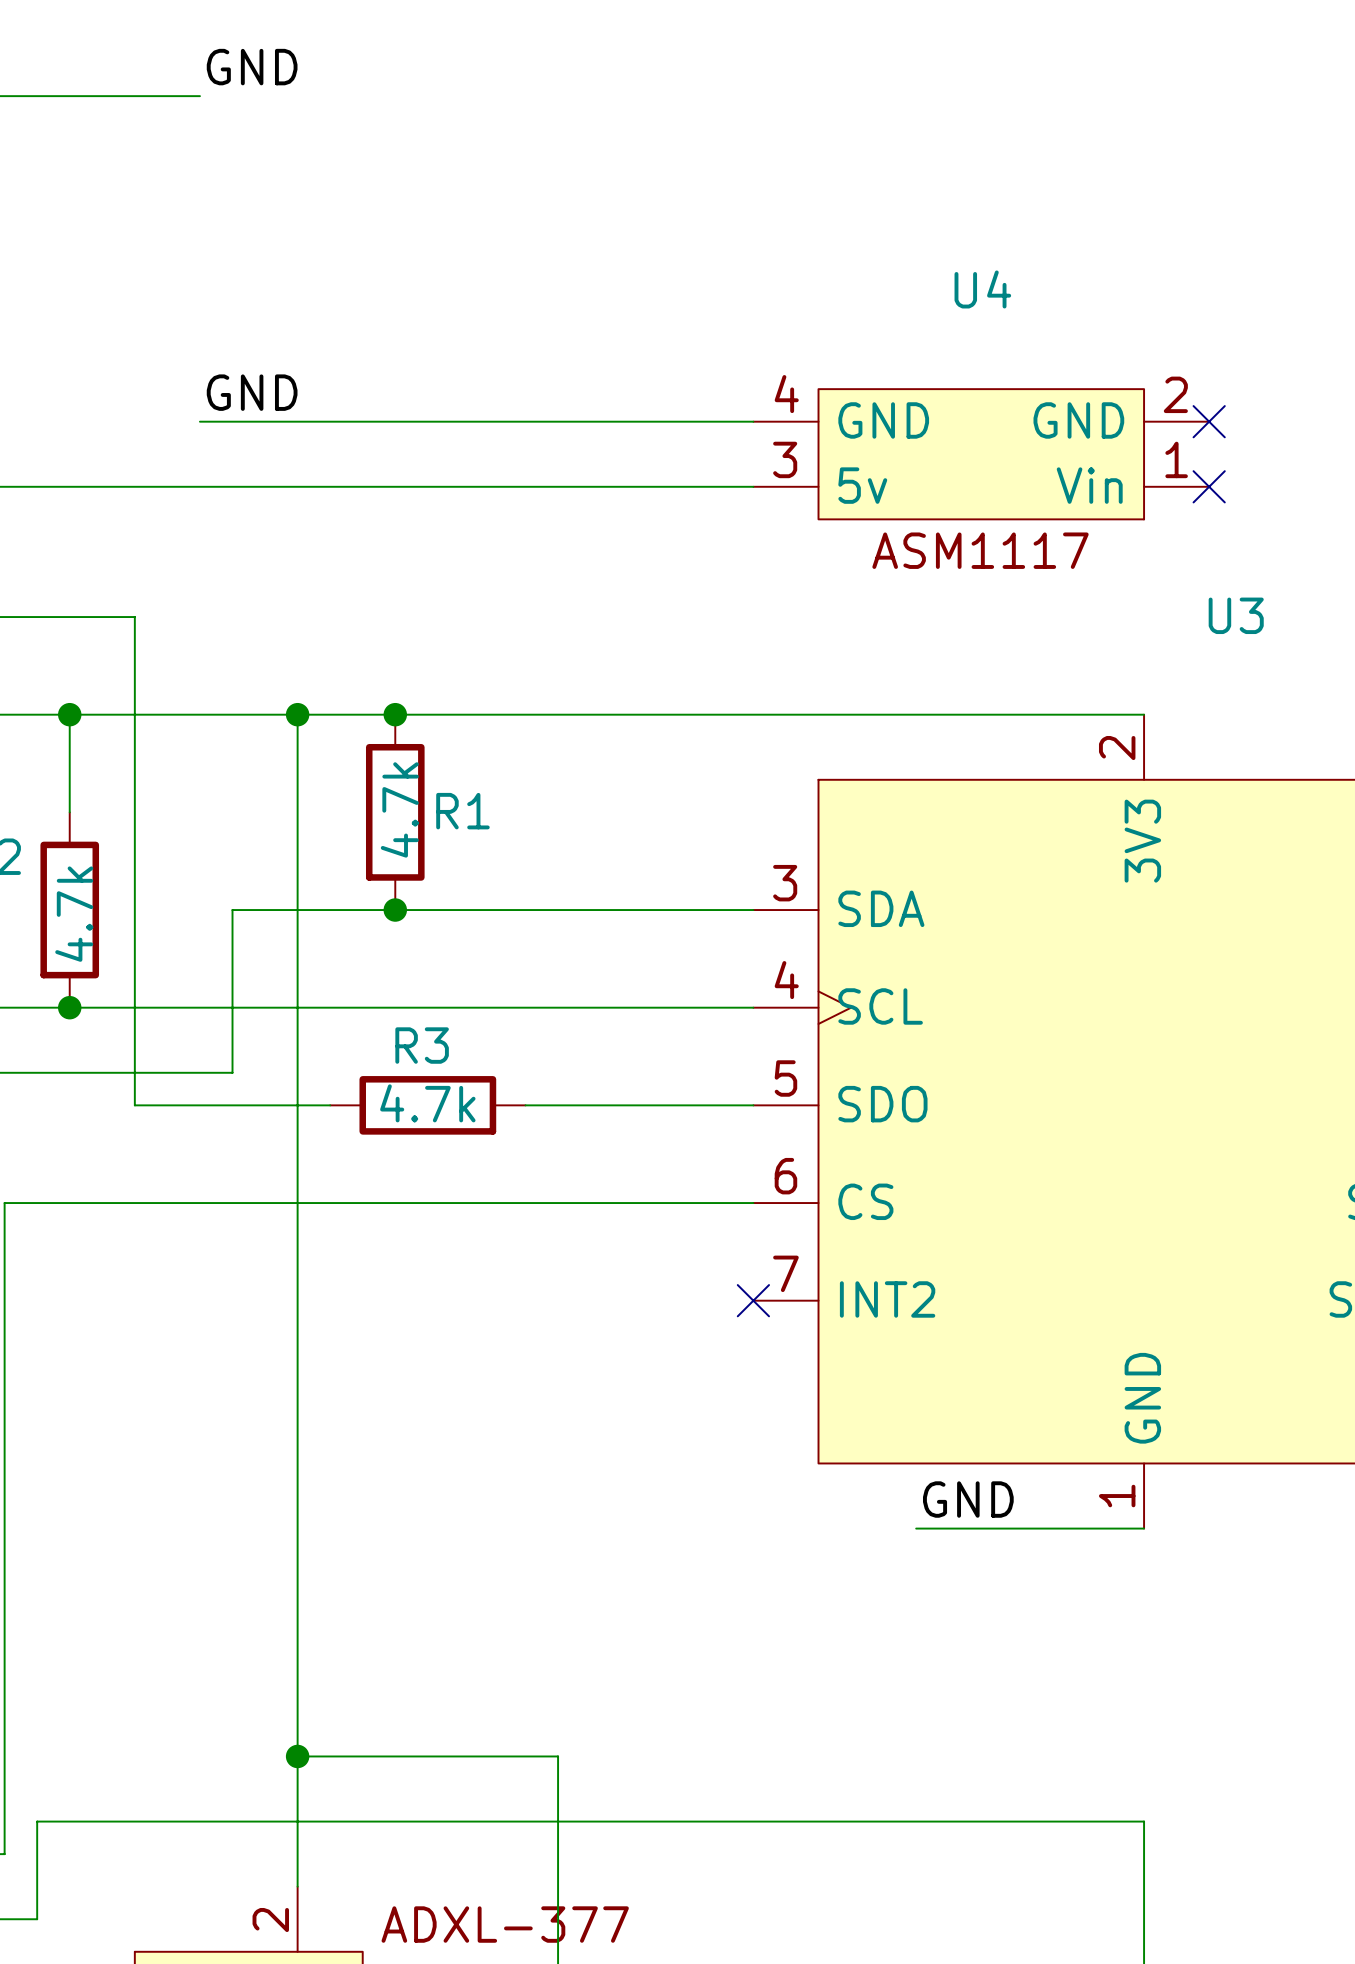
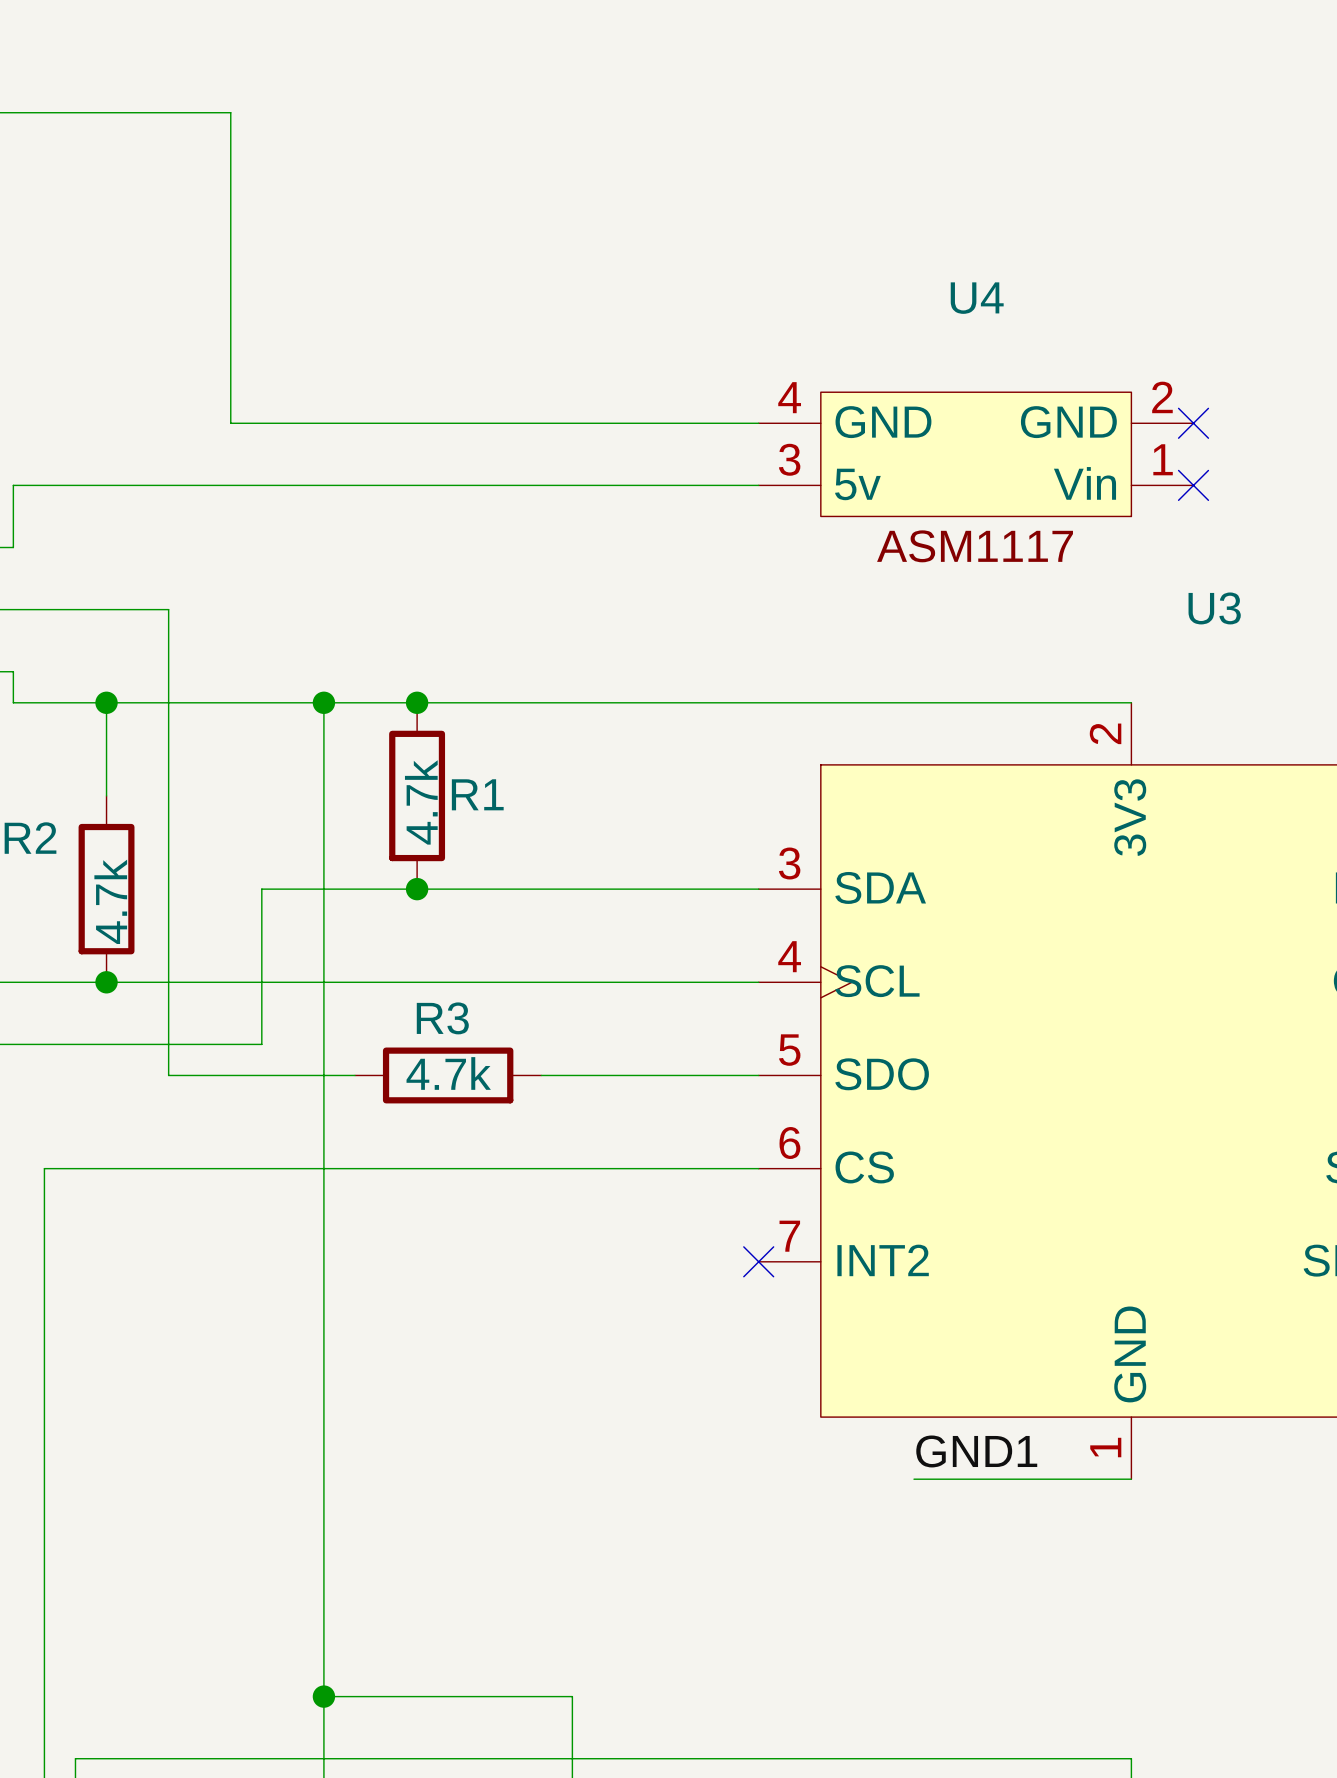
label: GND (252, 67) -> none
wire: none -> (230, 112) (230, 423)
label: GND (252, 392) -> none
label: GND (968, 1499) -> GND1 (976, 1451)

